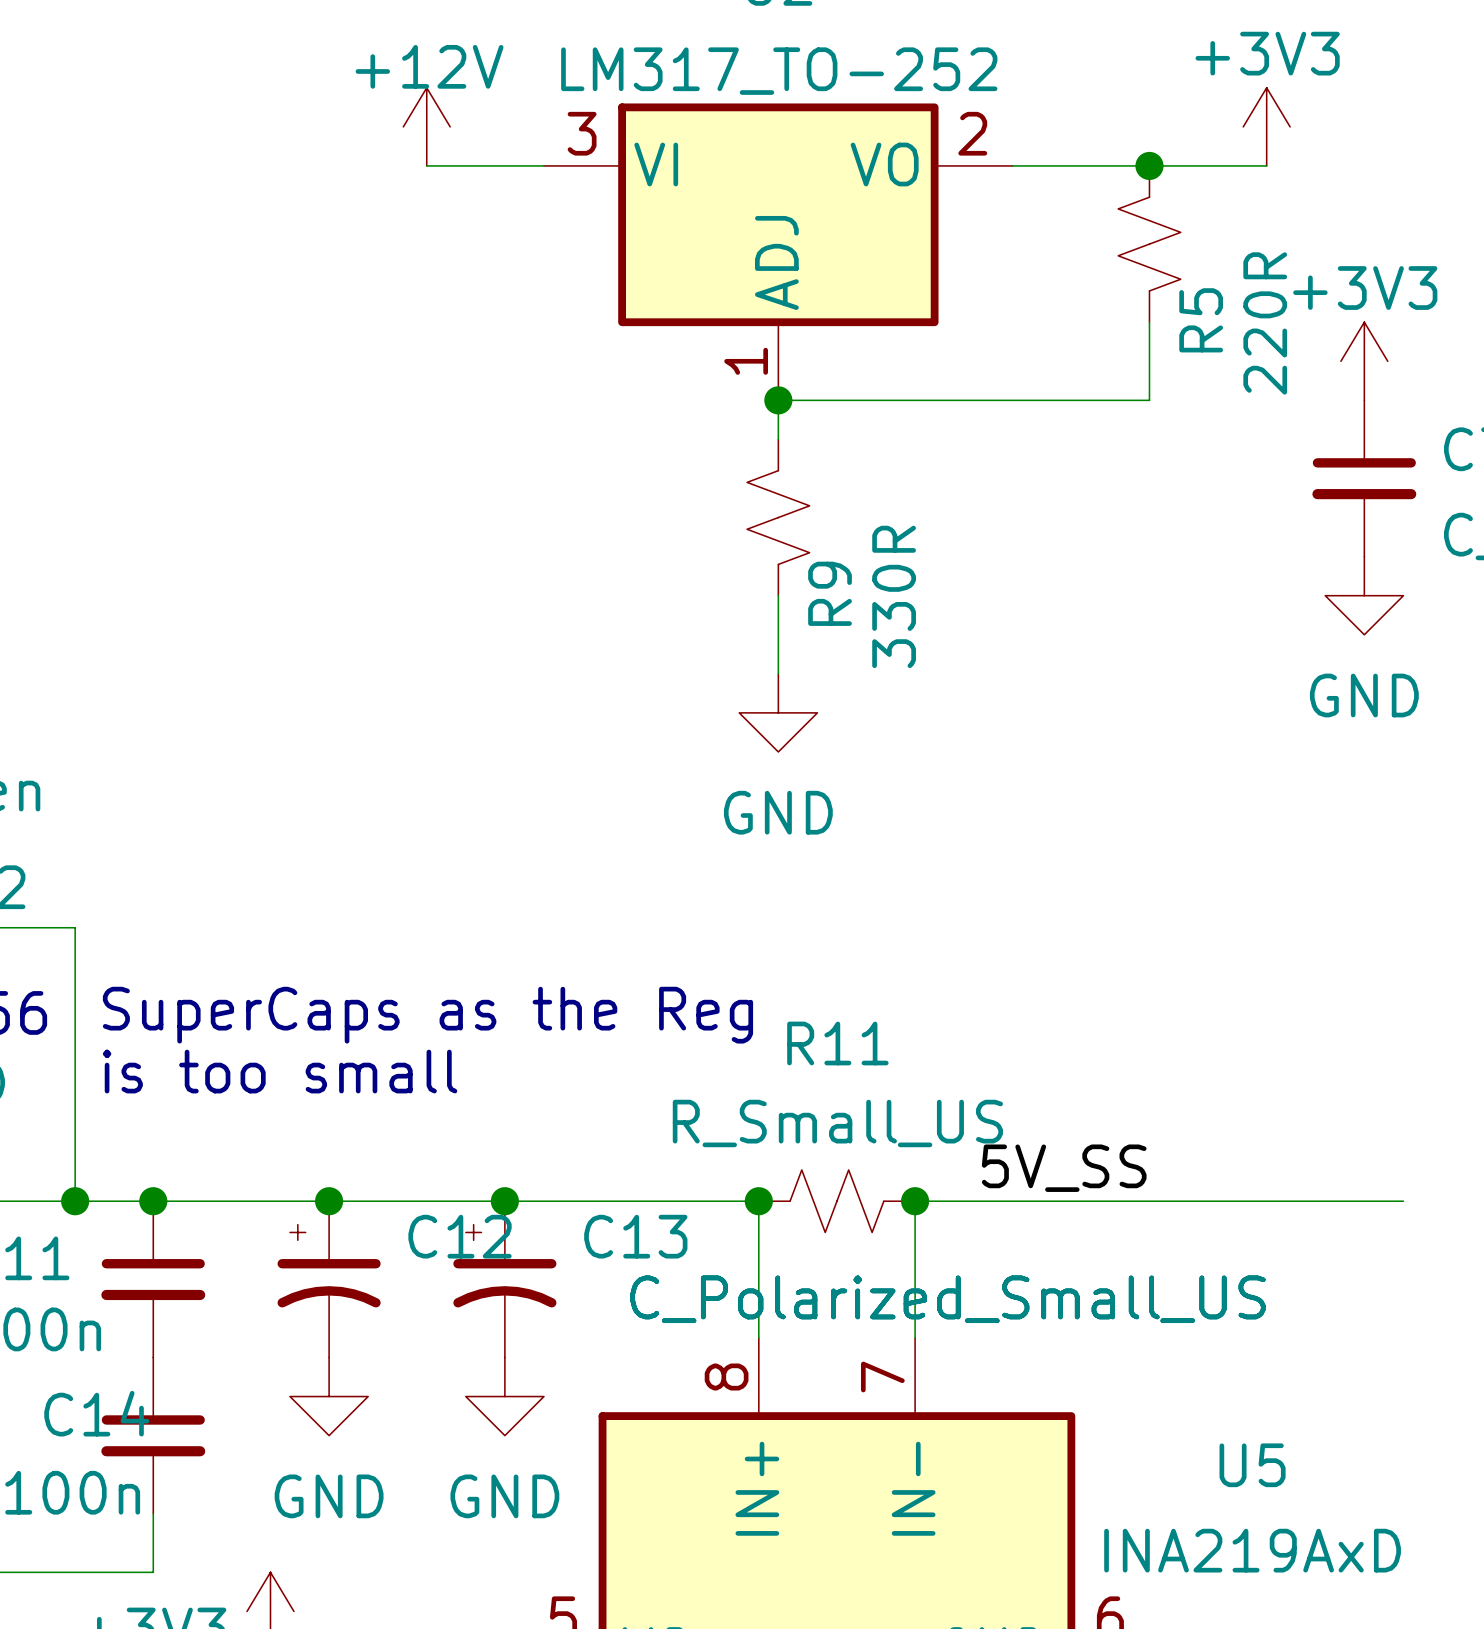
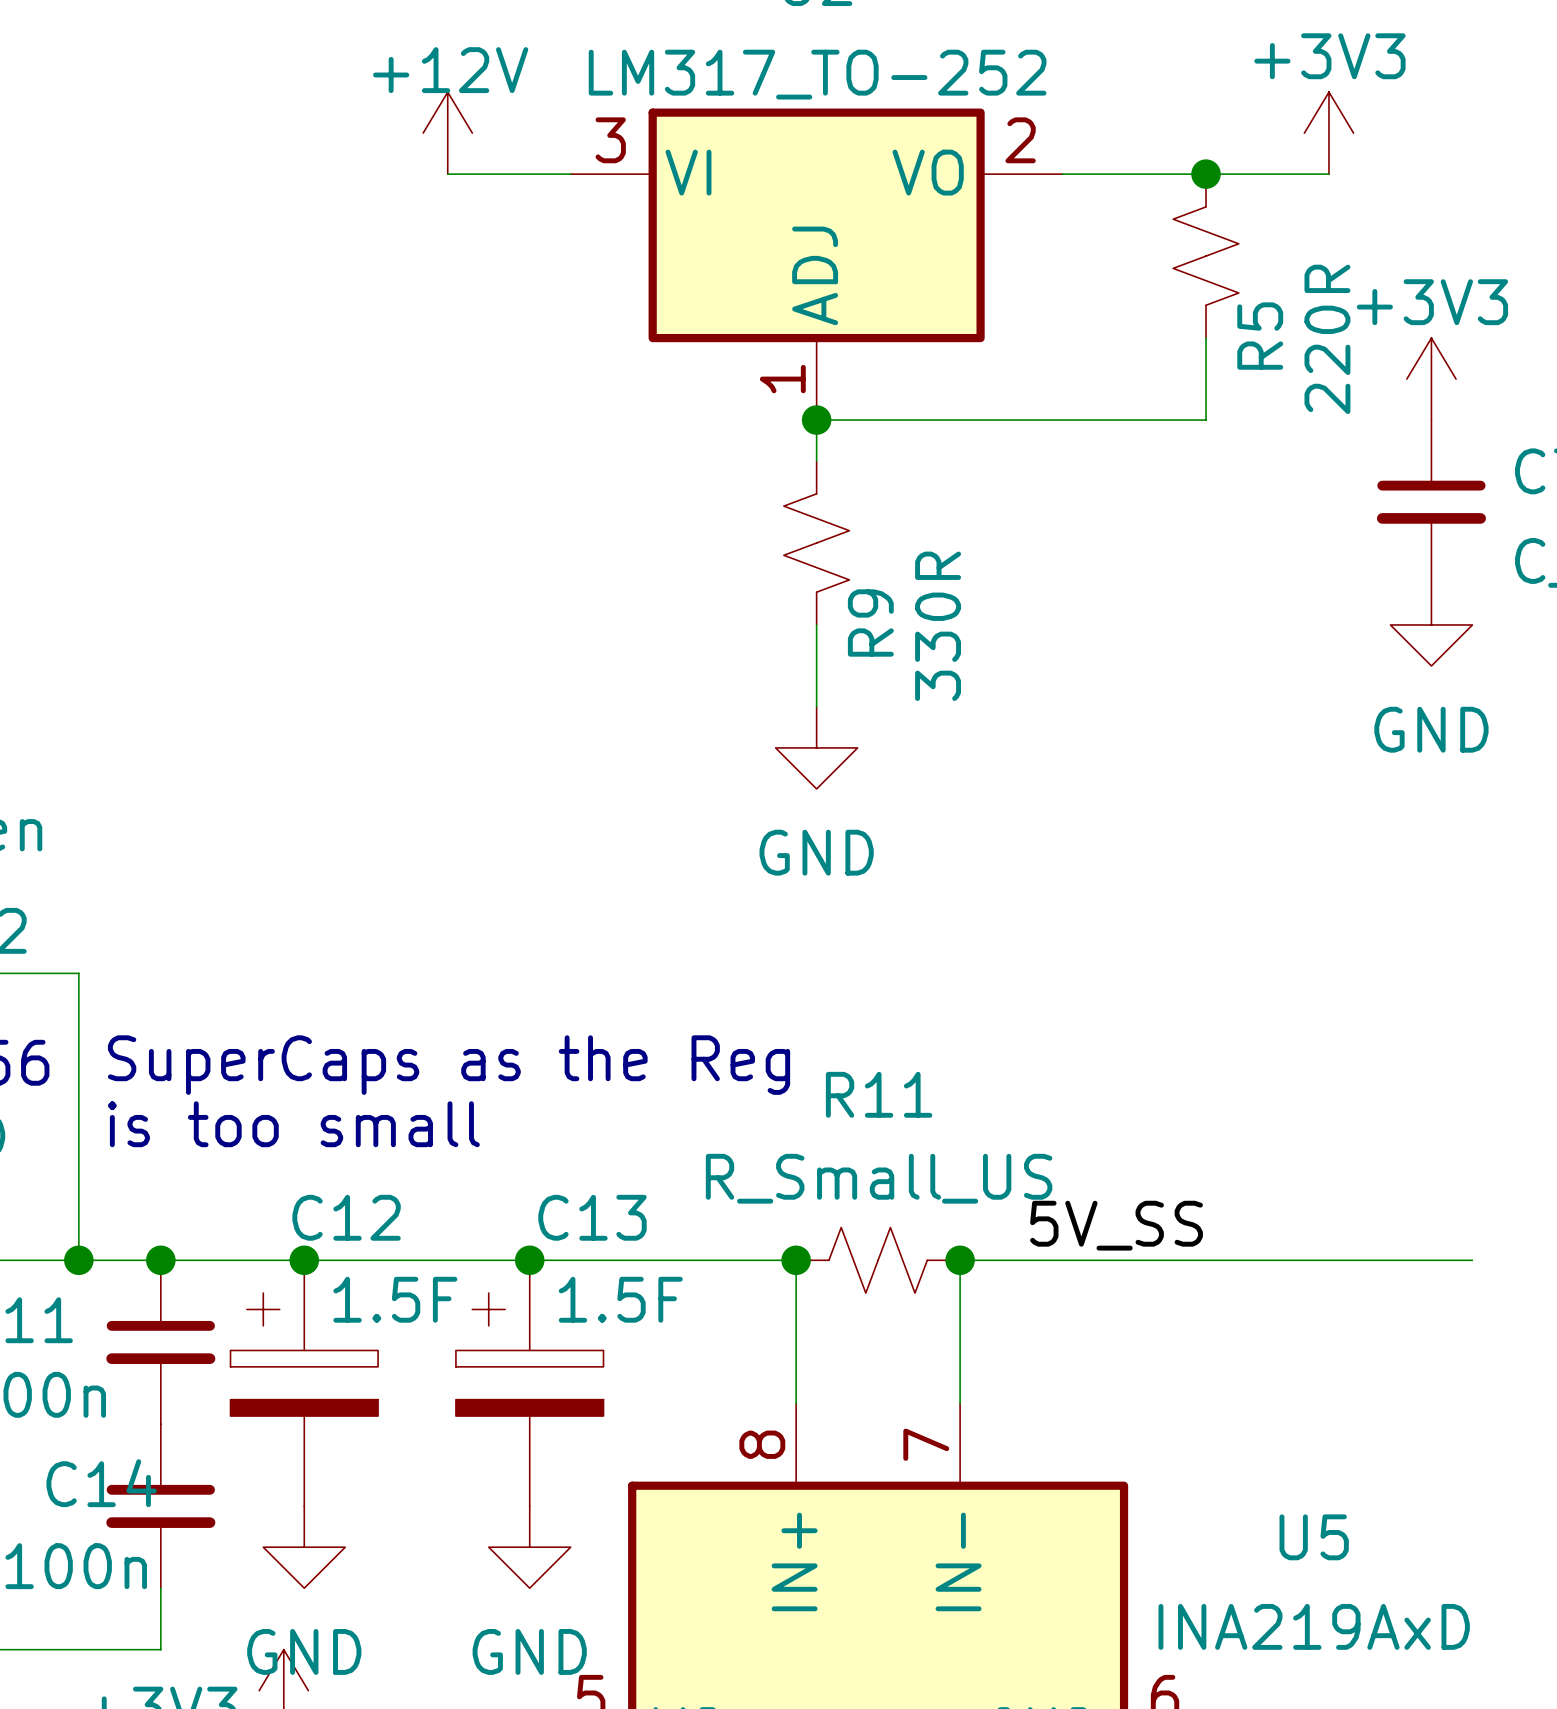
C12 symbol: [277, 1201, 381, 1358] -> [230, 1260, 379, 1507]
junction position: (329, 1201) -> (304, 1260)
C13 symbol: [453, 1201, 557, 1358] -> [455, 1260, 604, 1507]
C12 name position: C12 (460, 1236) -> C12 (346, 1217)
C13 name position: C13 (635, 1236) -> C13 (592, 1217)
C13 value: C_Polarized_Small_US (947, 1299) -> 1.5F (620, 1299)
C12 value: C_Polarized_Small_US (947, 1299) -> 1.5F (395, 1299)
power symbol position: GND (329, 1396) -> GND (304, 1547)
power symbol position: GND (504, 1396) -> GND (529, 1547)

